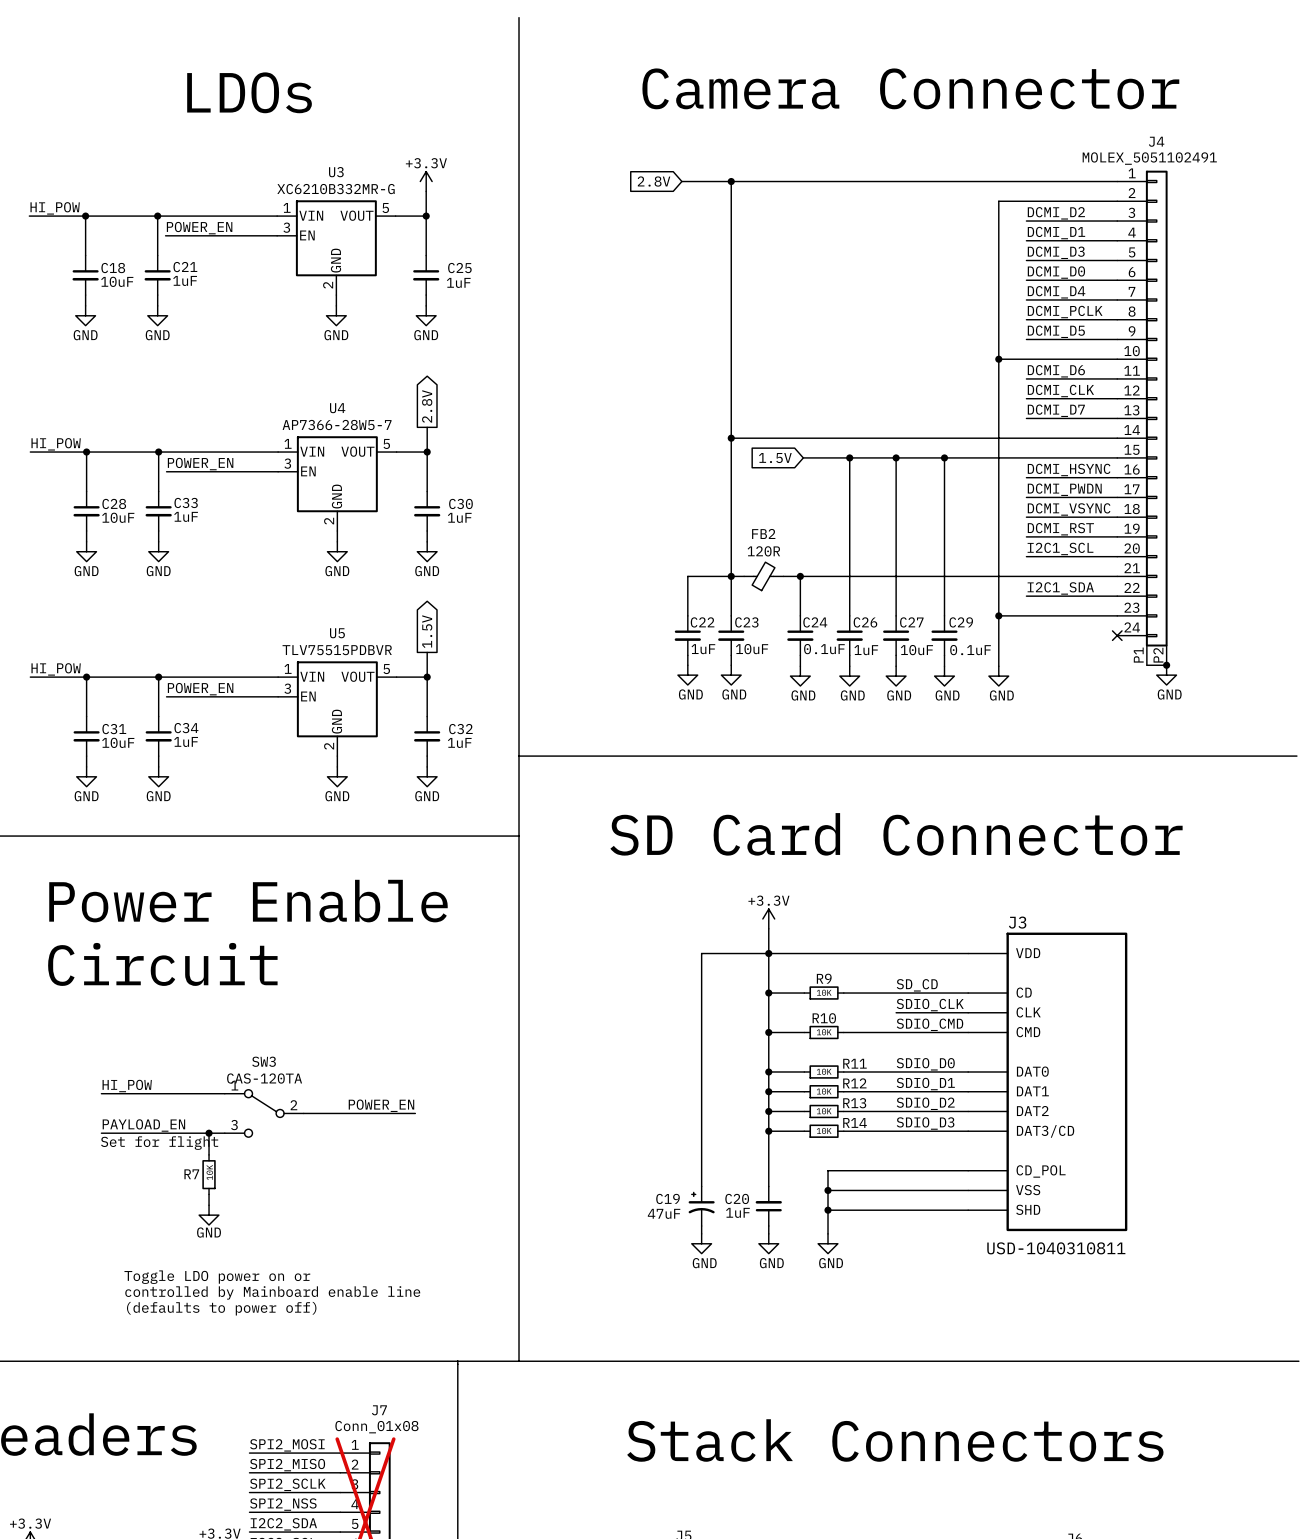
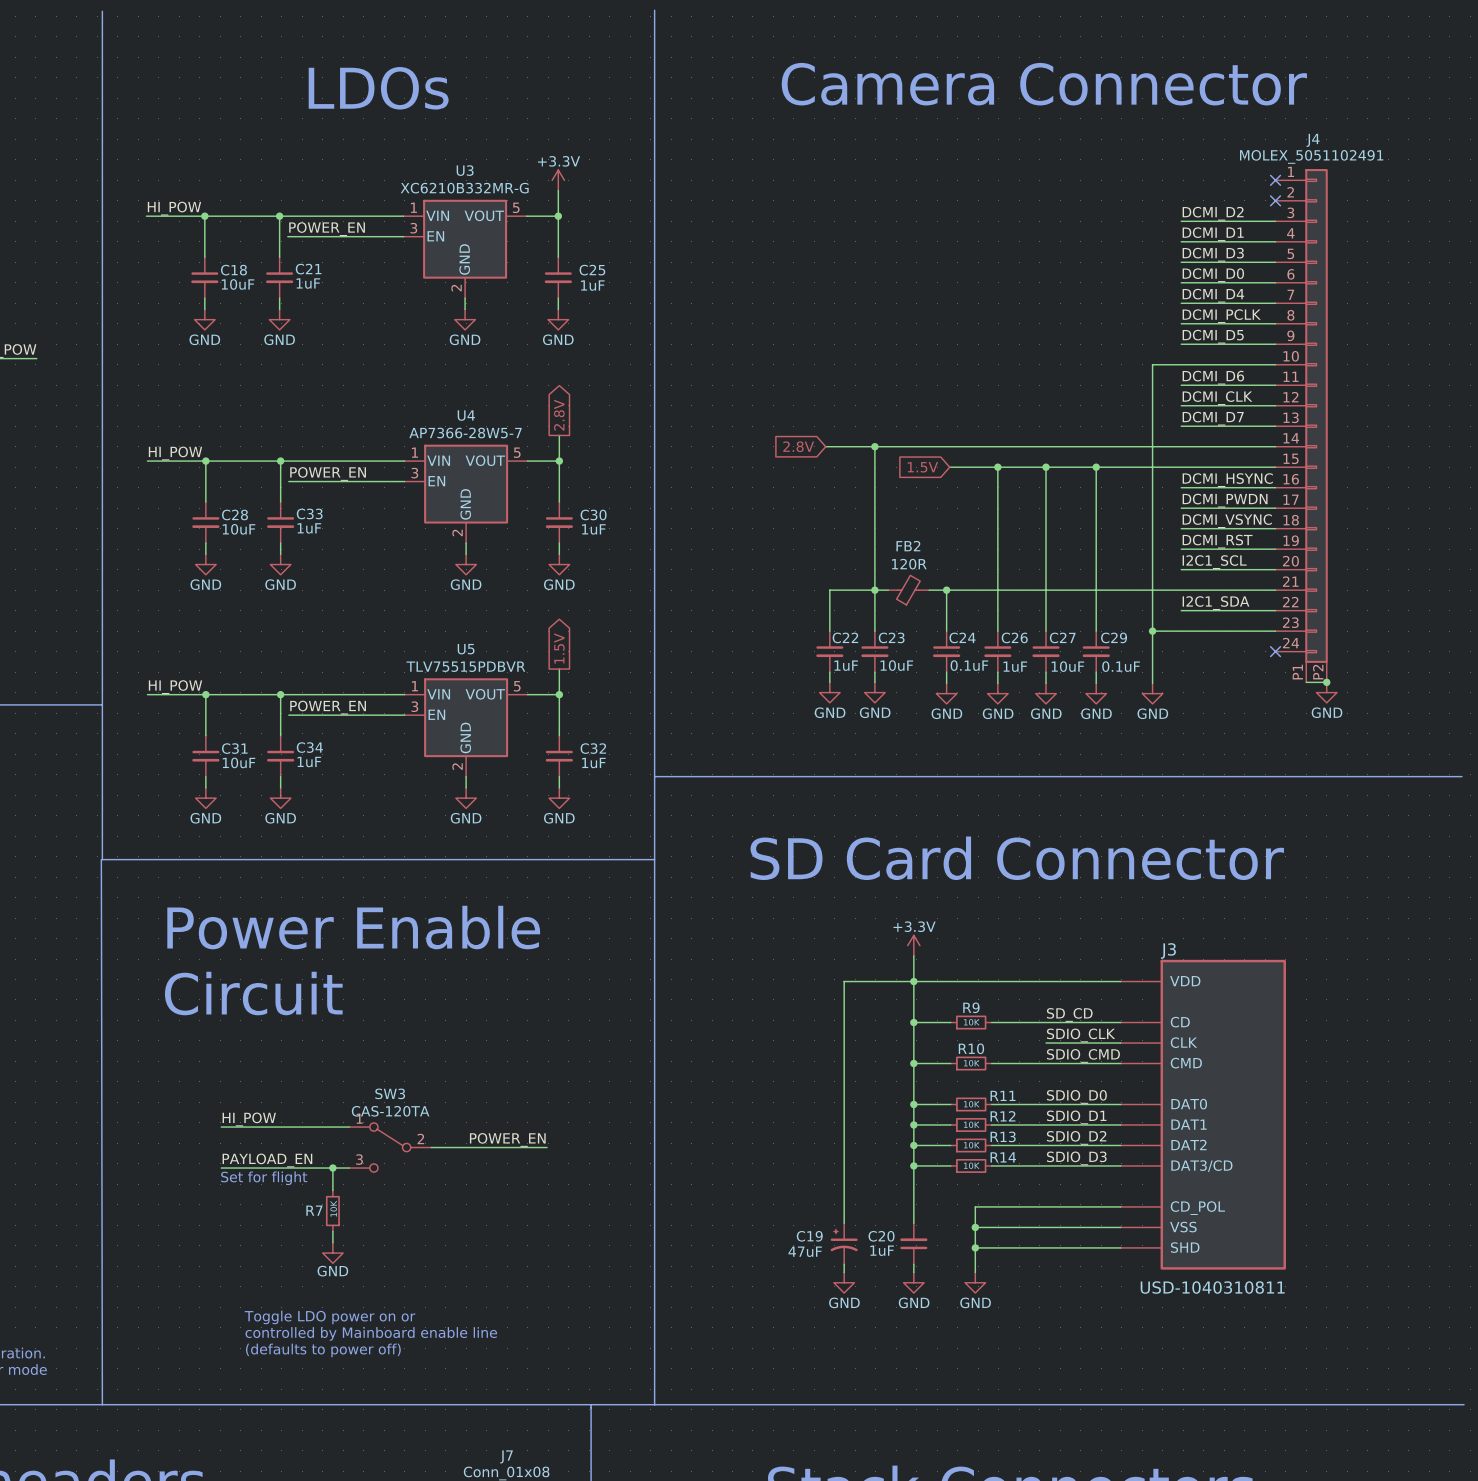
global label: 2.8V (654, 181) -> none
wire: (681, 181) (1117, 181) -> none
wire: (731, 181) (731, 438) -> (825, 446) (874, 446)
junction: (731, 181) -> none
no-connect mark: none -> (1275, 180)
wire: (1117, 201) (998, 201) (998, 359) -> none
no-connect mark: none -> (1275, 200)
junction: (998, 359) -> none
global label: none -> 2.8V (798, 446)

